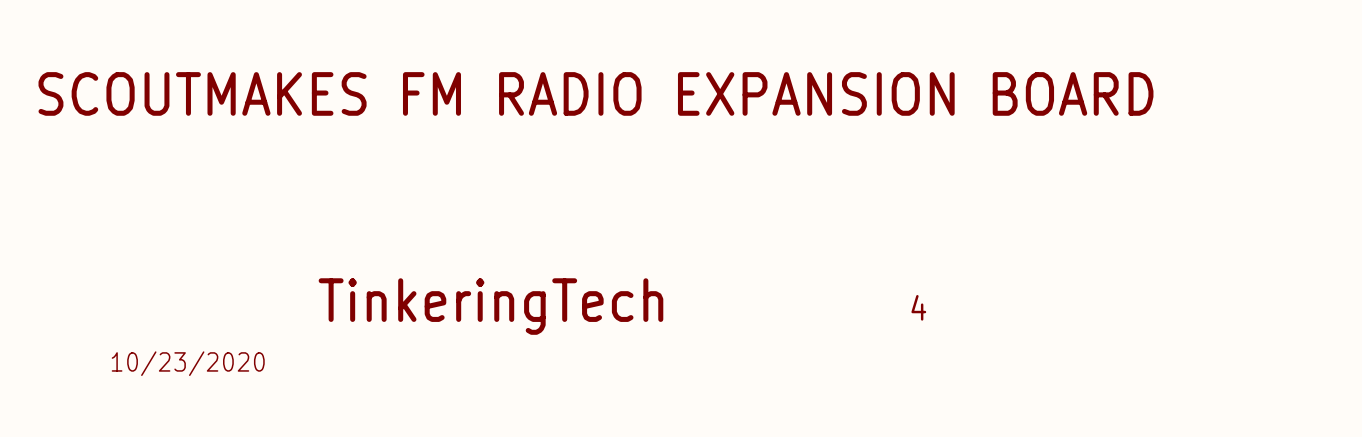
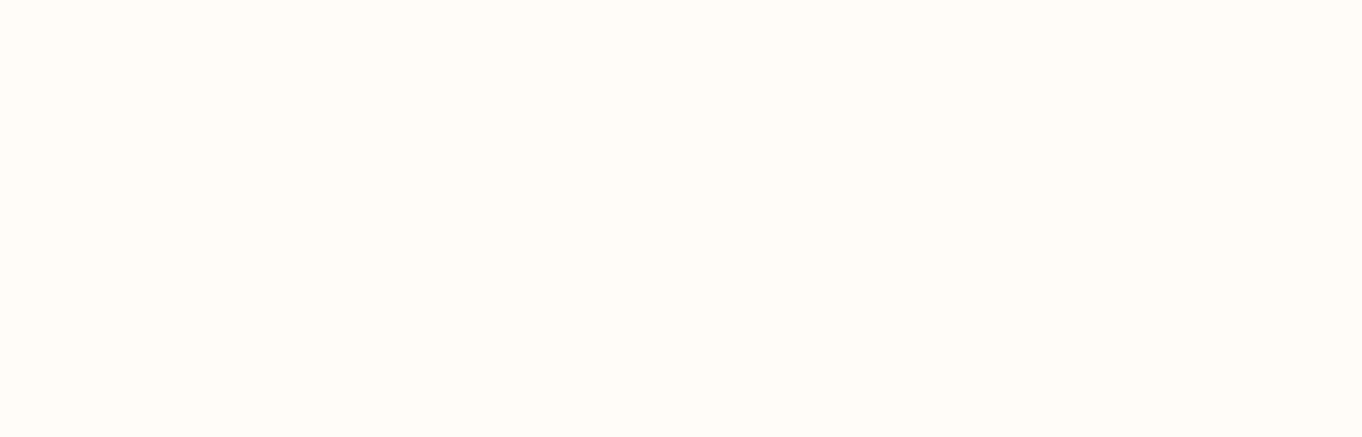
text: SCOUTMAKES FM RADIO EXPANSION BOARD (595, 93) -> none
text: TinkeringTech (490, 306) -> none
text: 4 (918, 307) -> none
text: 10/23/2020 (188, 363) -> none

